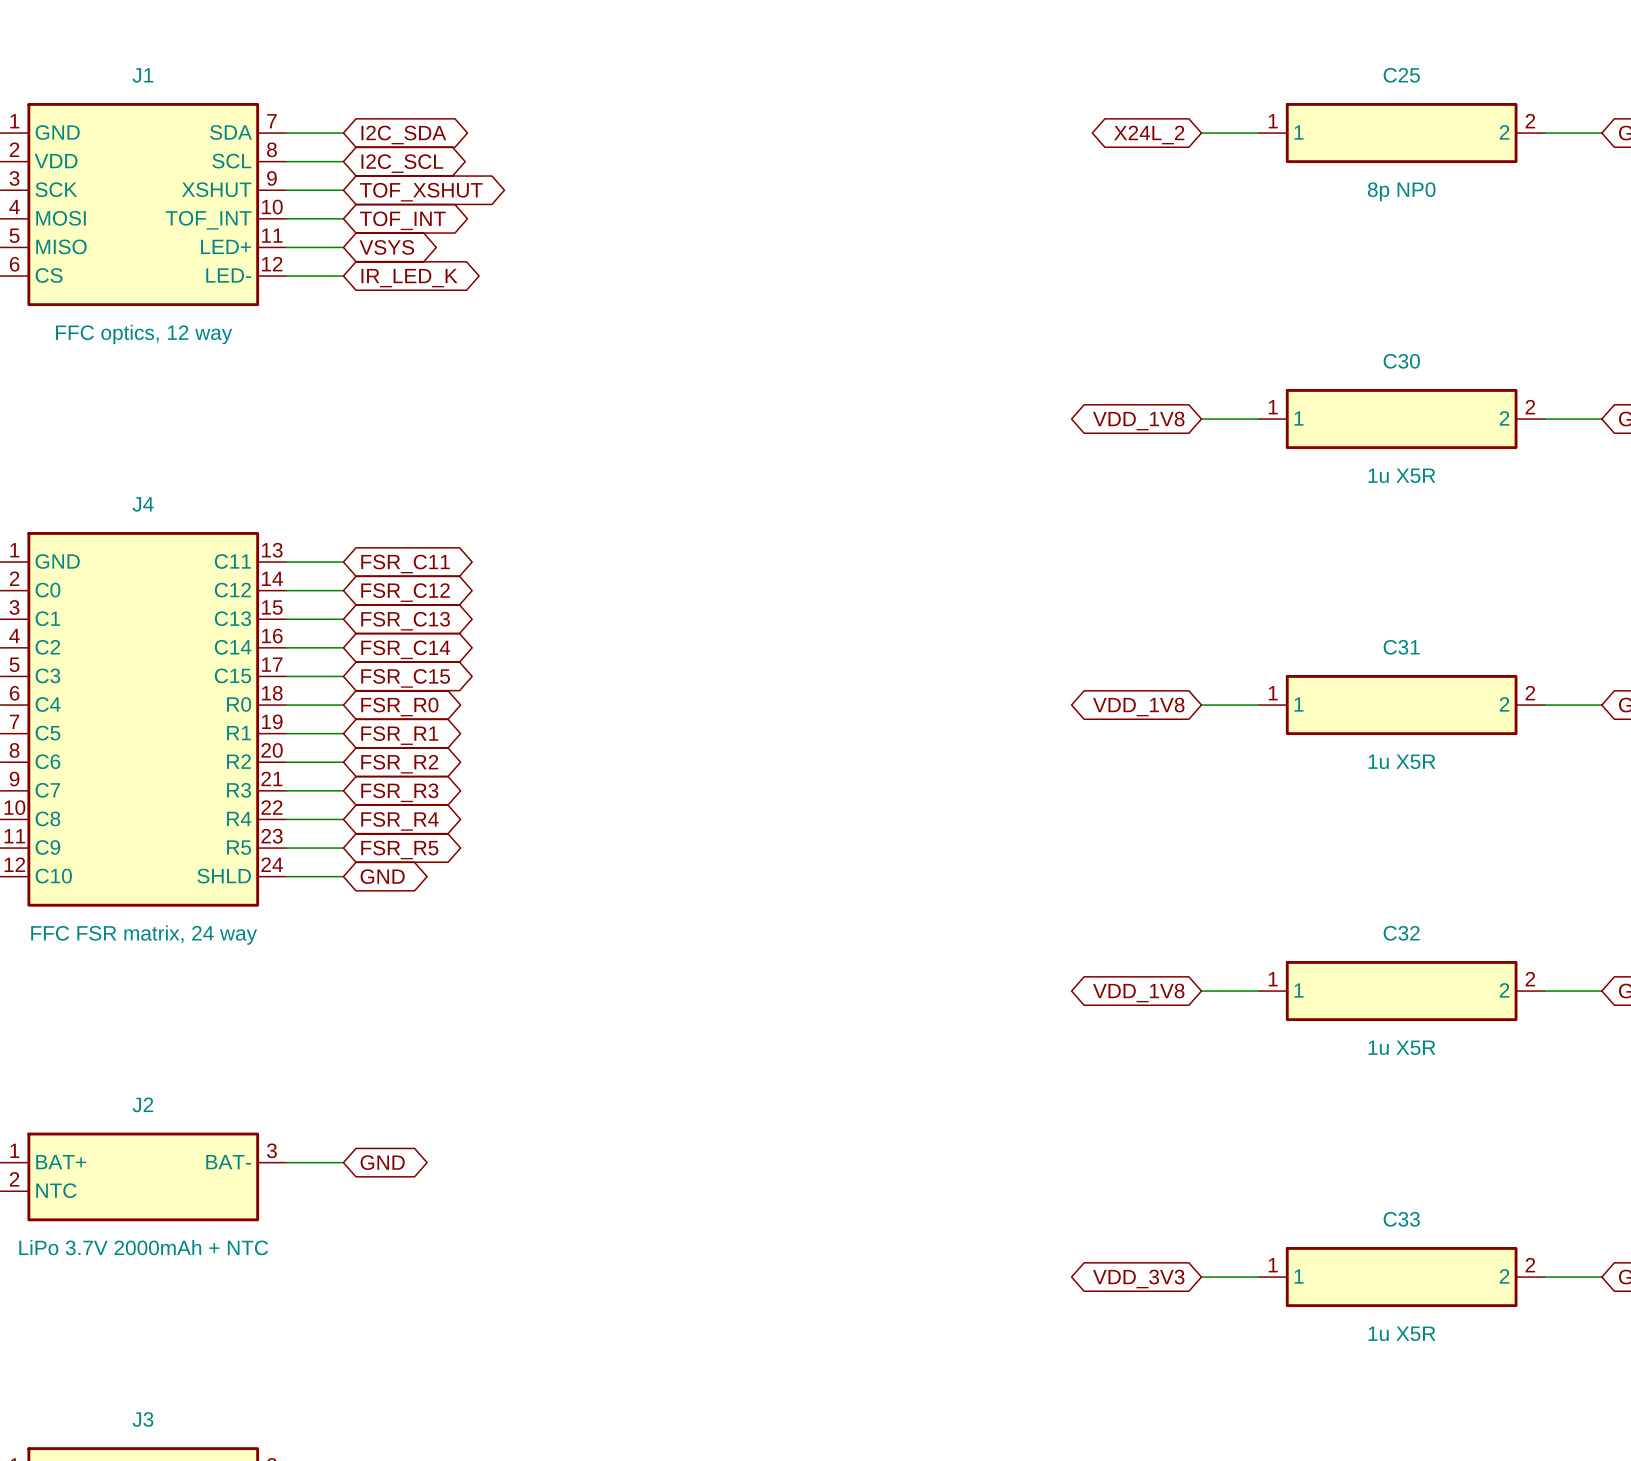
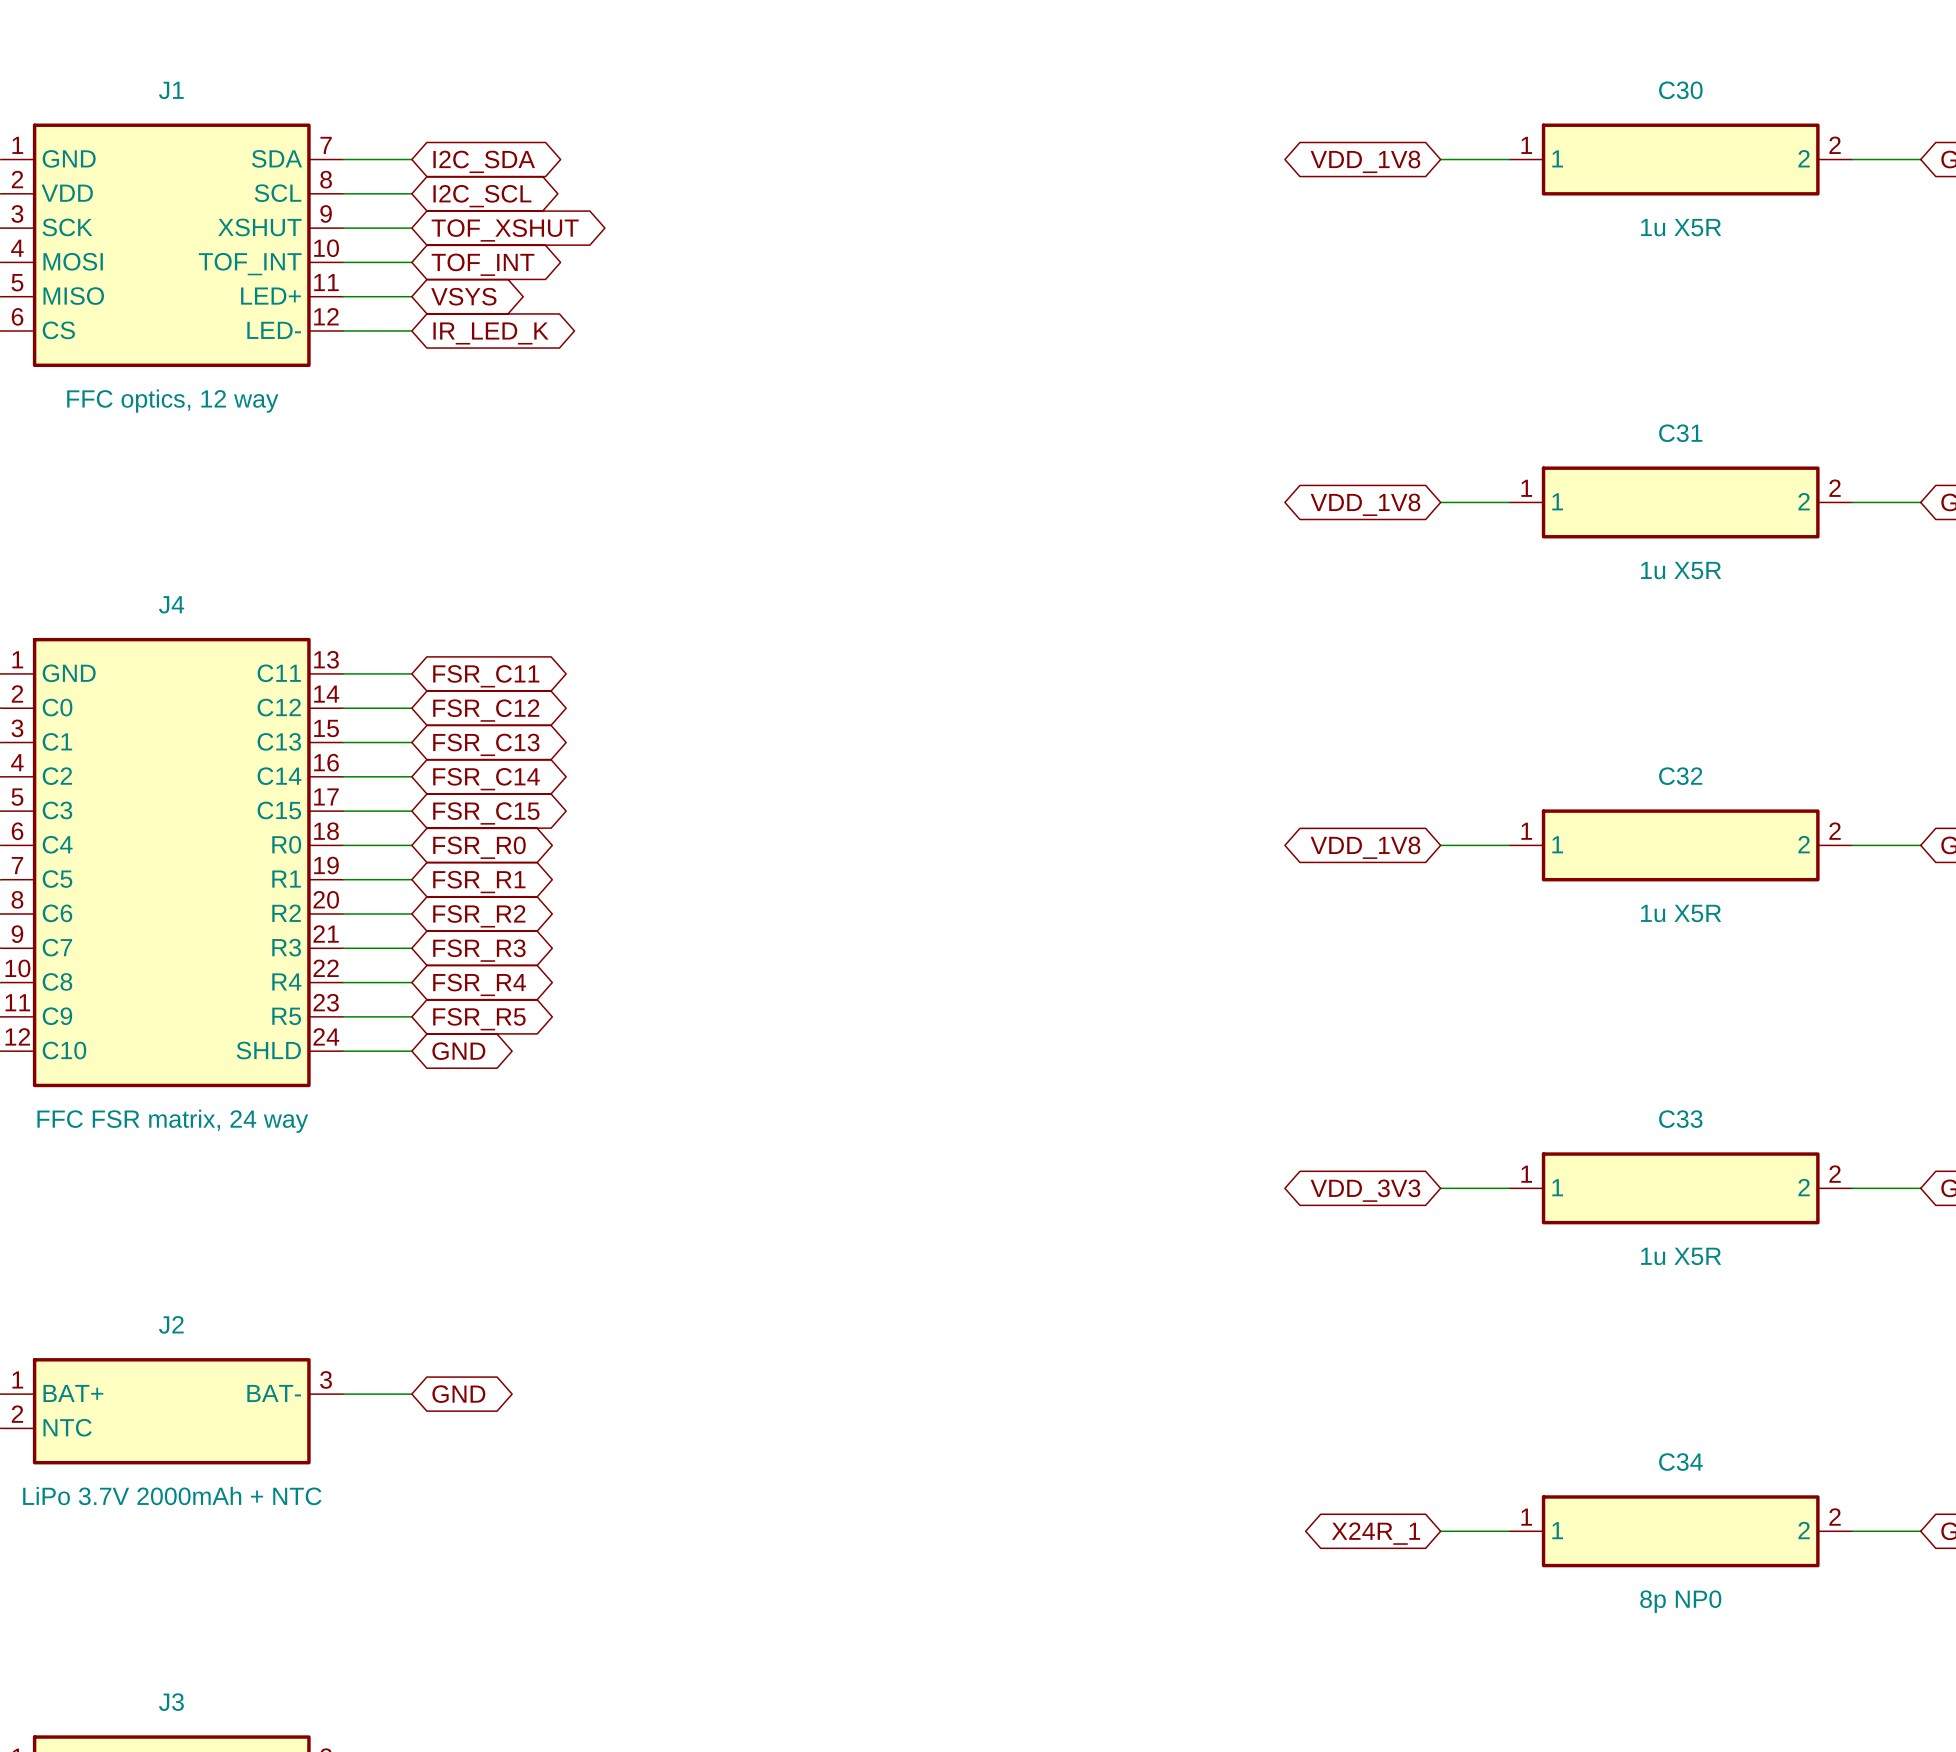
C25 name: C25 (1401, 75) -> C30 (1680, 90)
global label: X24L_2 (1149, 135) -> VDD_1V8 (1365, 161)
C25 value: 8p NP0 (1401, 191) -> 1u X5R (1681, 227)
C30 name: C30 (1401, 361) -> C31 (1680, 433)
C31 name: C31 (1401, 647) -> C32 (1680, 776)
C32 name: C32 (1401, 933) -> C33 (1680, 1119)
global label: VDD_1V8 (1138, 993) -> VDD_3V3 (1365, 1190)
C33 name: C33 (1401, 1219) -> C34 (1680, 1462)
global label: VDD_3V3 (1138, 1279) -> X24R_1 (1376, 1533)
C33 value: 1u X5R (1401, 1333) -> 8p NP0 (1680, 1601)

